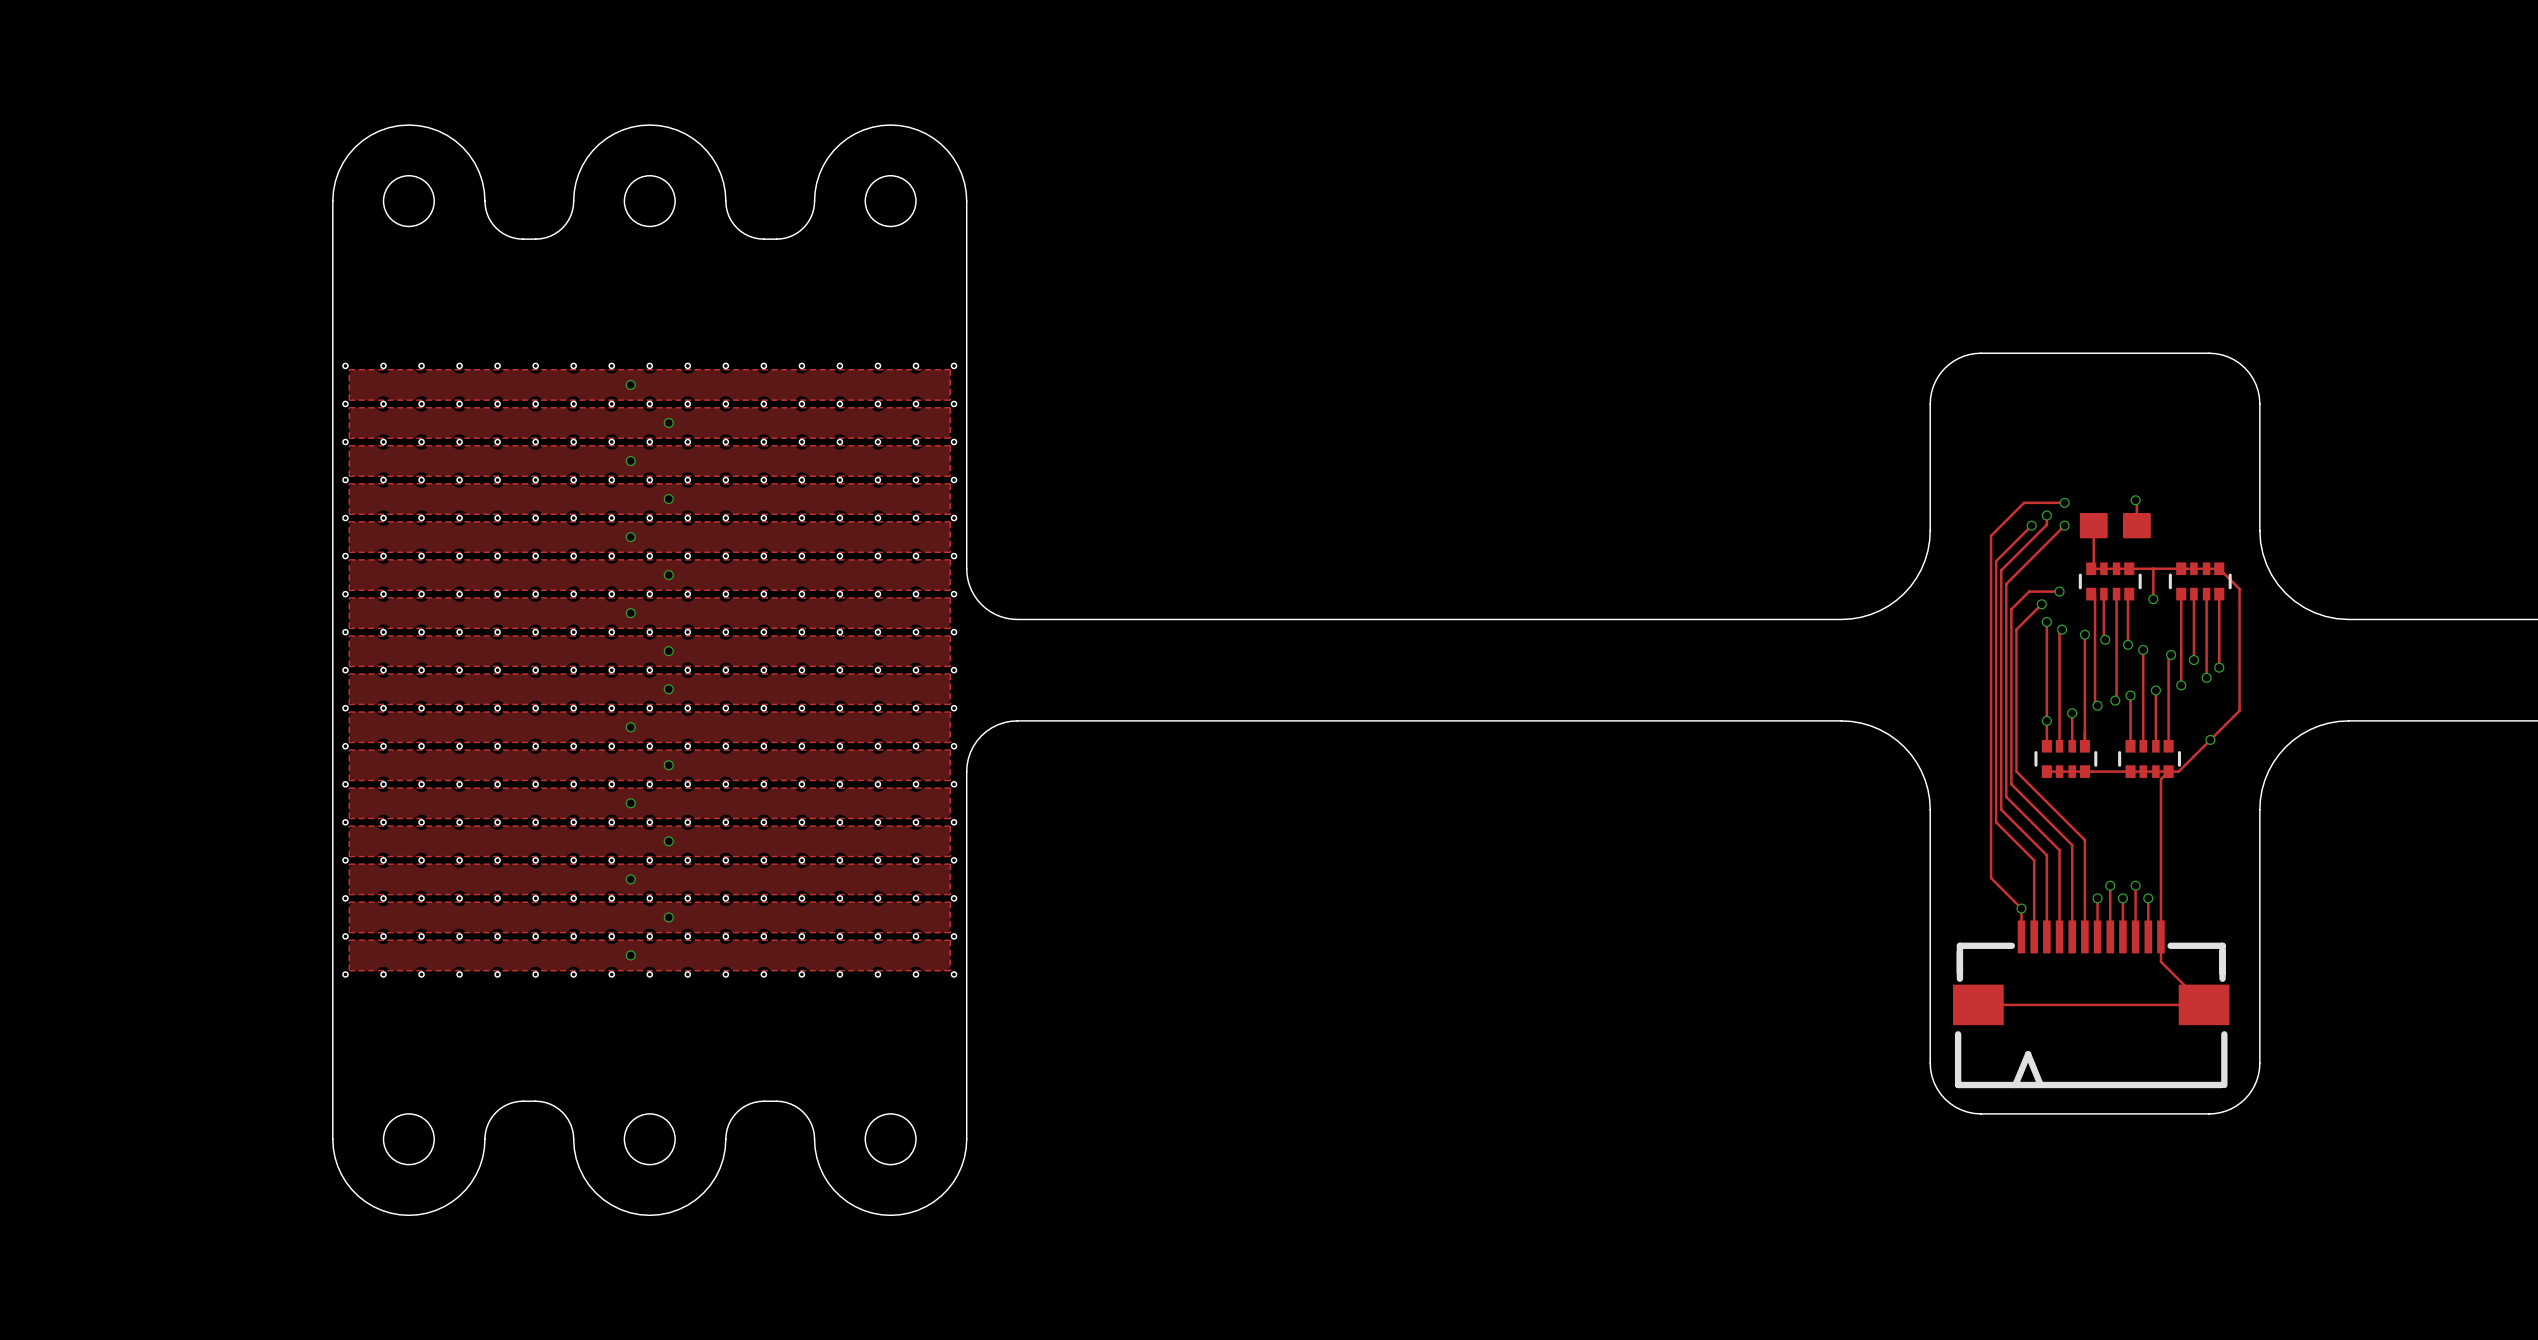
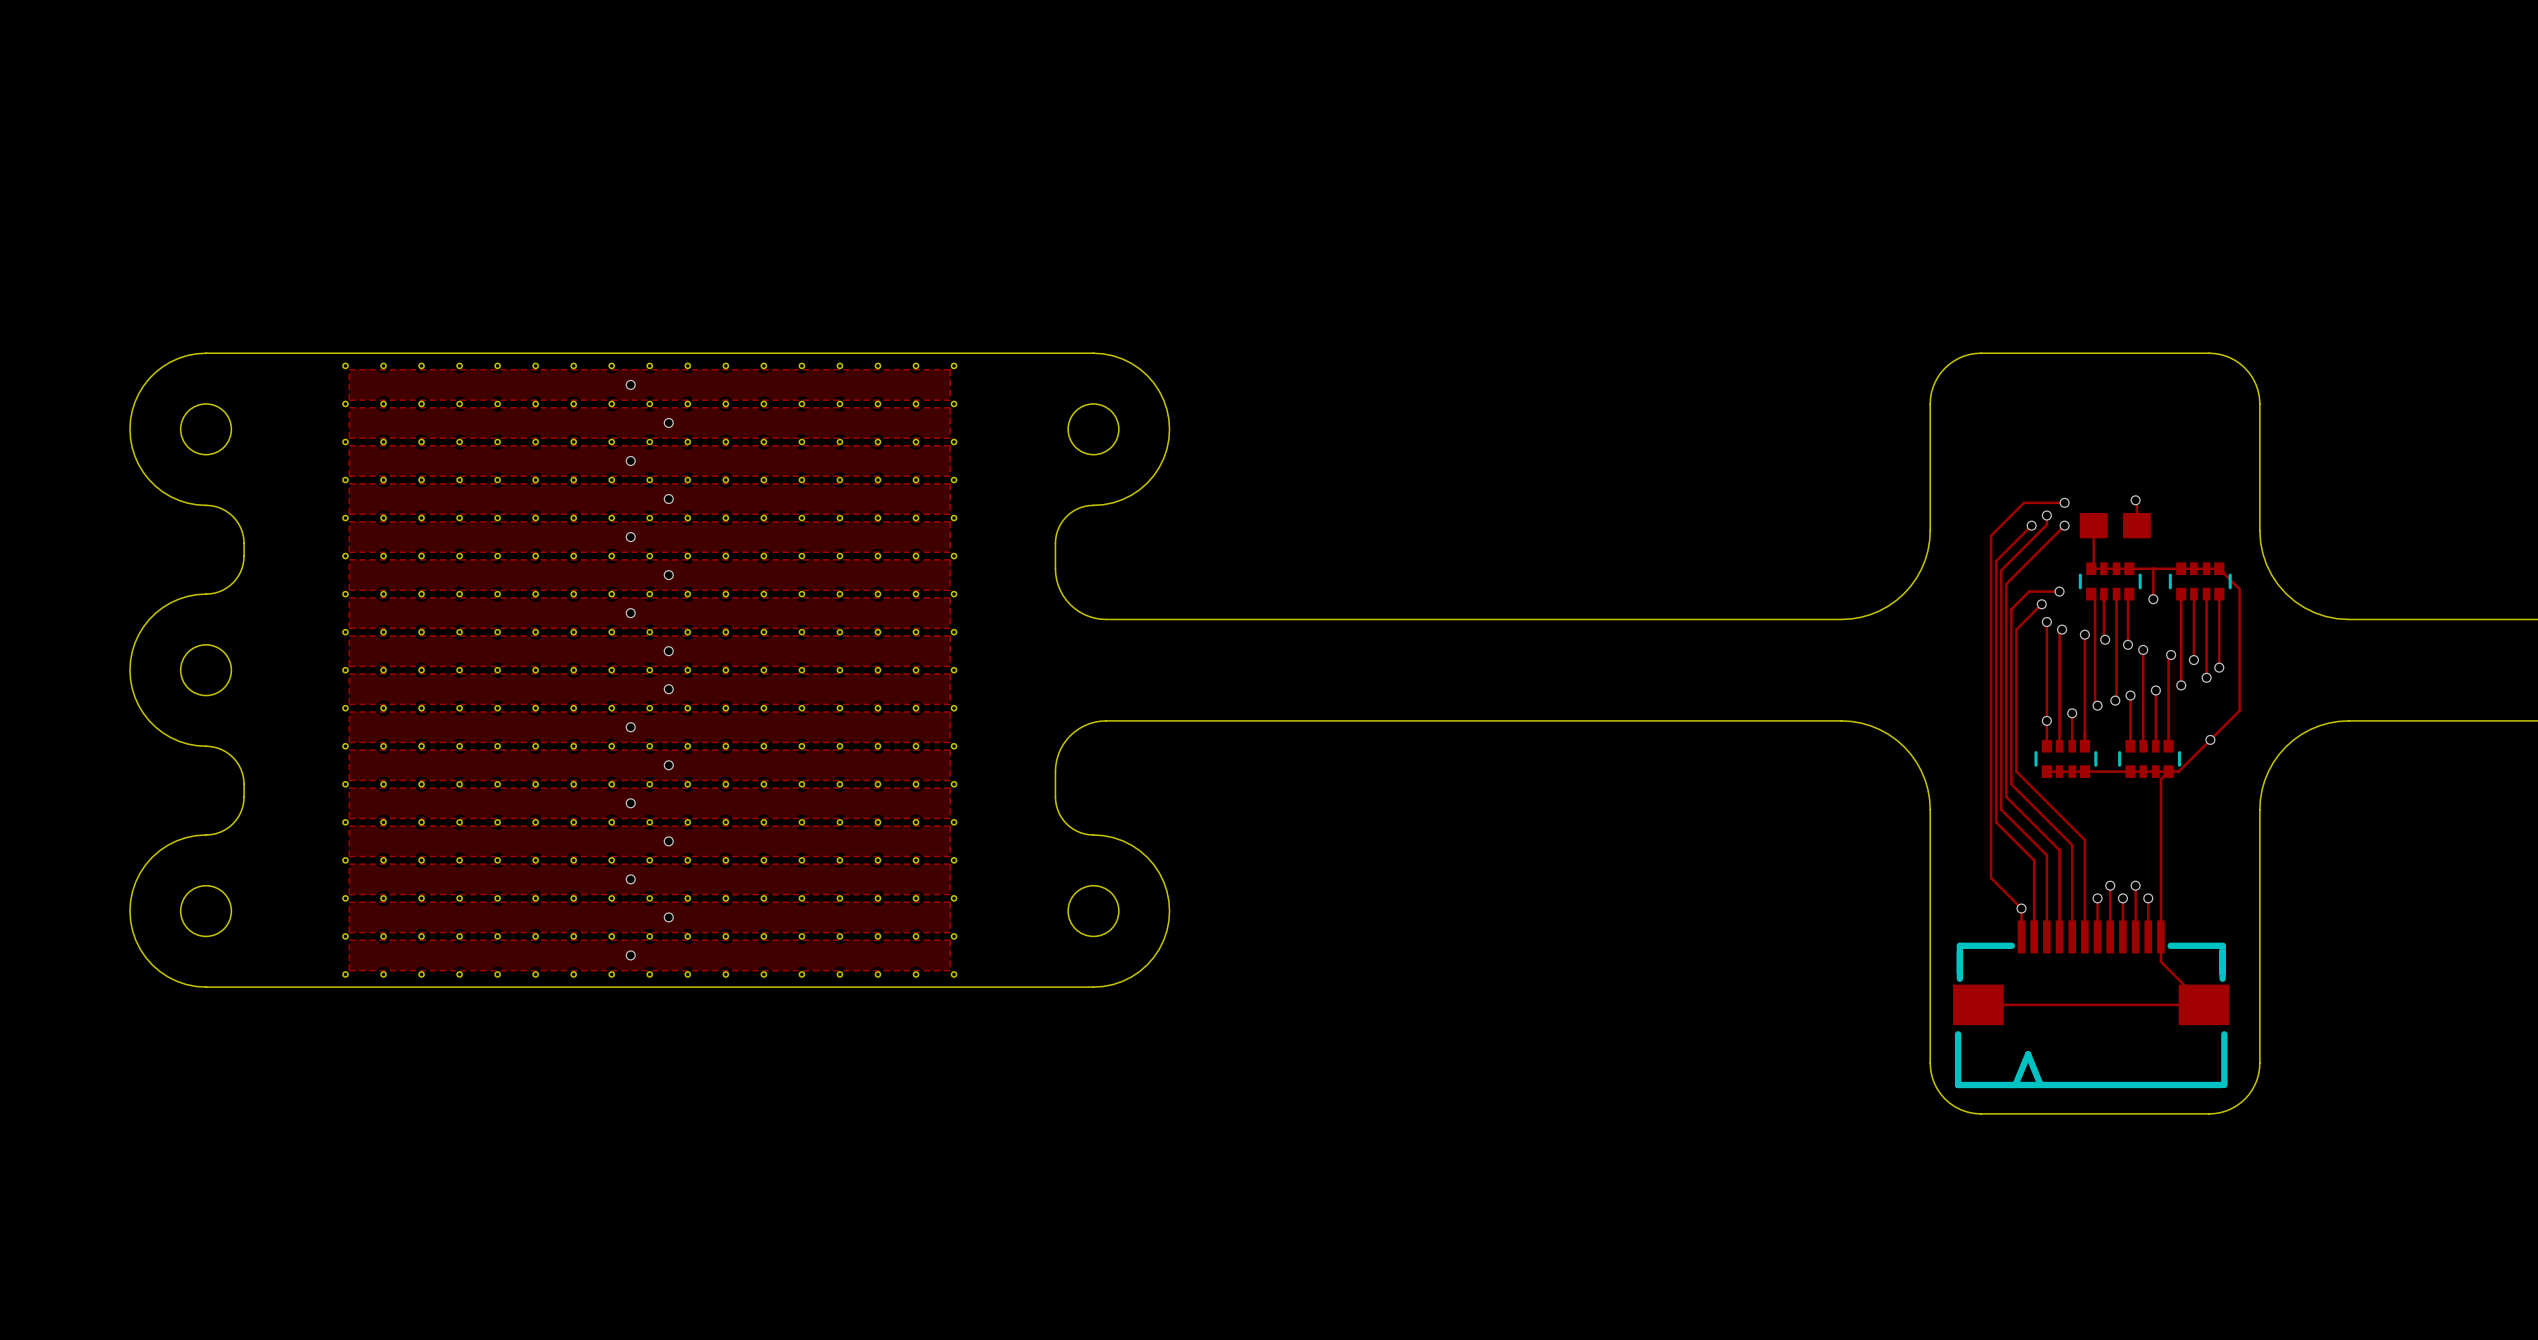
round board edge: [383, 175, 435, 227] -> none
round board edge: [623, 175, 676, 227] -> none
round board edge: [864, 175, 917, 227] -> none
round board edge: none -> [180, 403, 232, 456]
round board edge: none -> [1067, 403, 1120, 456]
board edge: (1106, 619) (1006, 618) (990, 611) (981, 604) (969, 585) (966, 568) (966, 191) (961, 174) (953, 157) (941, 144) (925, 133) (899, 125) (881, 125) (863, 129) (847, 138) (833, 150) (823, 165) (816, 182) (813, 209) (808, 221) (796, 233) (776, 239) (754, 237) (736, 228) (728, 215) (723, 182) (712, 157) (692, 138) (676, 129) (658, 125) (631, 127) (614, 133) (599, 144) (587, 157) (578, 174) (572, 210) (568, 220) (554, 234) (540, 238) (514, 238) (496, 228) (487, 213) (482, 181) (474, 163) (462, 147) (437, 130) (408, 125) (389, 127) (362, 140) (343, 163) (335, 181) (332, 201) (332, 1139) (335, 1157) (341, 1174) (351, 1189) (365, 1201) (390, 1213) (408, 1215) (435, 1210) (452, 1201) (465, 1189) (476, 1174) (482, 1157) (485, 1130) (490, 1119) (502, 1107) (522, 1101) (545, 1102) (562, 1112) (570, 1124) (576, 1158) (589, 1185) (611, 1205) (630, 1212) (659, 1214) (678, 1209) (696, 1199) (710, 1185) (720, 1168) (725, 1149) (727, 1129) (733, 1116) (744, 1106) (763, 1101) (781, 1101) (791, 1104) (806, 1116) (813, 1129) (816, 1157) (823, 1174) (833, 1189) (855, 1206) (872, 1213) (890, 1215) (908, 1213) (933, 1201) (947, 1189) (957, 1174) (966, 1148) (966, 771) (970, 752) (981, 735) (992, 727) (1004, 722) (1017, 720) (1106, 720) -> (1106, 619) (1094, 618) (1079, 611) (1066, 600) (1060, 590) (1055, 568) (1057, 530) (1066, 516) (1076, 509) (1122, 499) (1147, 483) (1163, 458) (1169, 429) (1166, 409) (1153, 383) (1131, 363) (1113, 355) (1093, 353) (206, 353) (187, 355) (162, 366) (143, 386) (132, 411) (129, 429) (132, 447) (138, 464) (149, 479) (162, 491) (179, 500) (214, 506) (226, 511) (238, 523) (243, 539) (243, 564) (232, 582) (218, 591) (187, 596) (162, 607) (149, 619) (138, 634) (130, 661) (130, 679) (134, 697) (149, 720) (162, 732) (179, 741) (215, 747) (225, 751) (238, 765) (243, 779) (242, 806) (232, 823) (220, 832) (186, 837) (159, 850) (145, 864) (132, 891) (130, 920) (140, 949) (159, 971) (186, 984) (206, 987) (1093, 987) (1113, 984) (1139, 971) (1153, 957) (1163, 940) (1169, 911) (1163, 881) (1147, 857) (1122, 840) (1076, 831) (1063, 820) (1057, 809) (1055, 771) (1060, 749) (1066, 739) (1079, 728) (1089, 723) (1106, 720)
round board edge: none -> [180, 644, 232, 697]
round board edge: none -> [180, 885, 232, 937]
round board edge: none -> [1067, 885, 1120, 937]
round board edge: [383, 1113, 435, 1166] -> none
round board edge: [623, 1113, 676, 1166] -> none
round board edge: [864, 1113, 917, 1166] -> none

